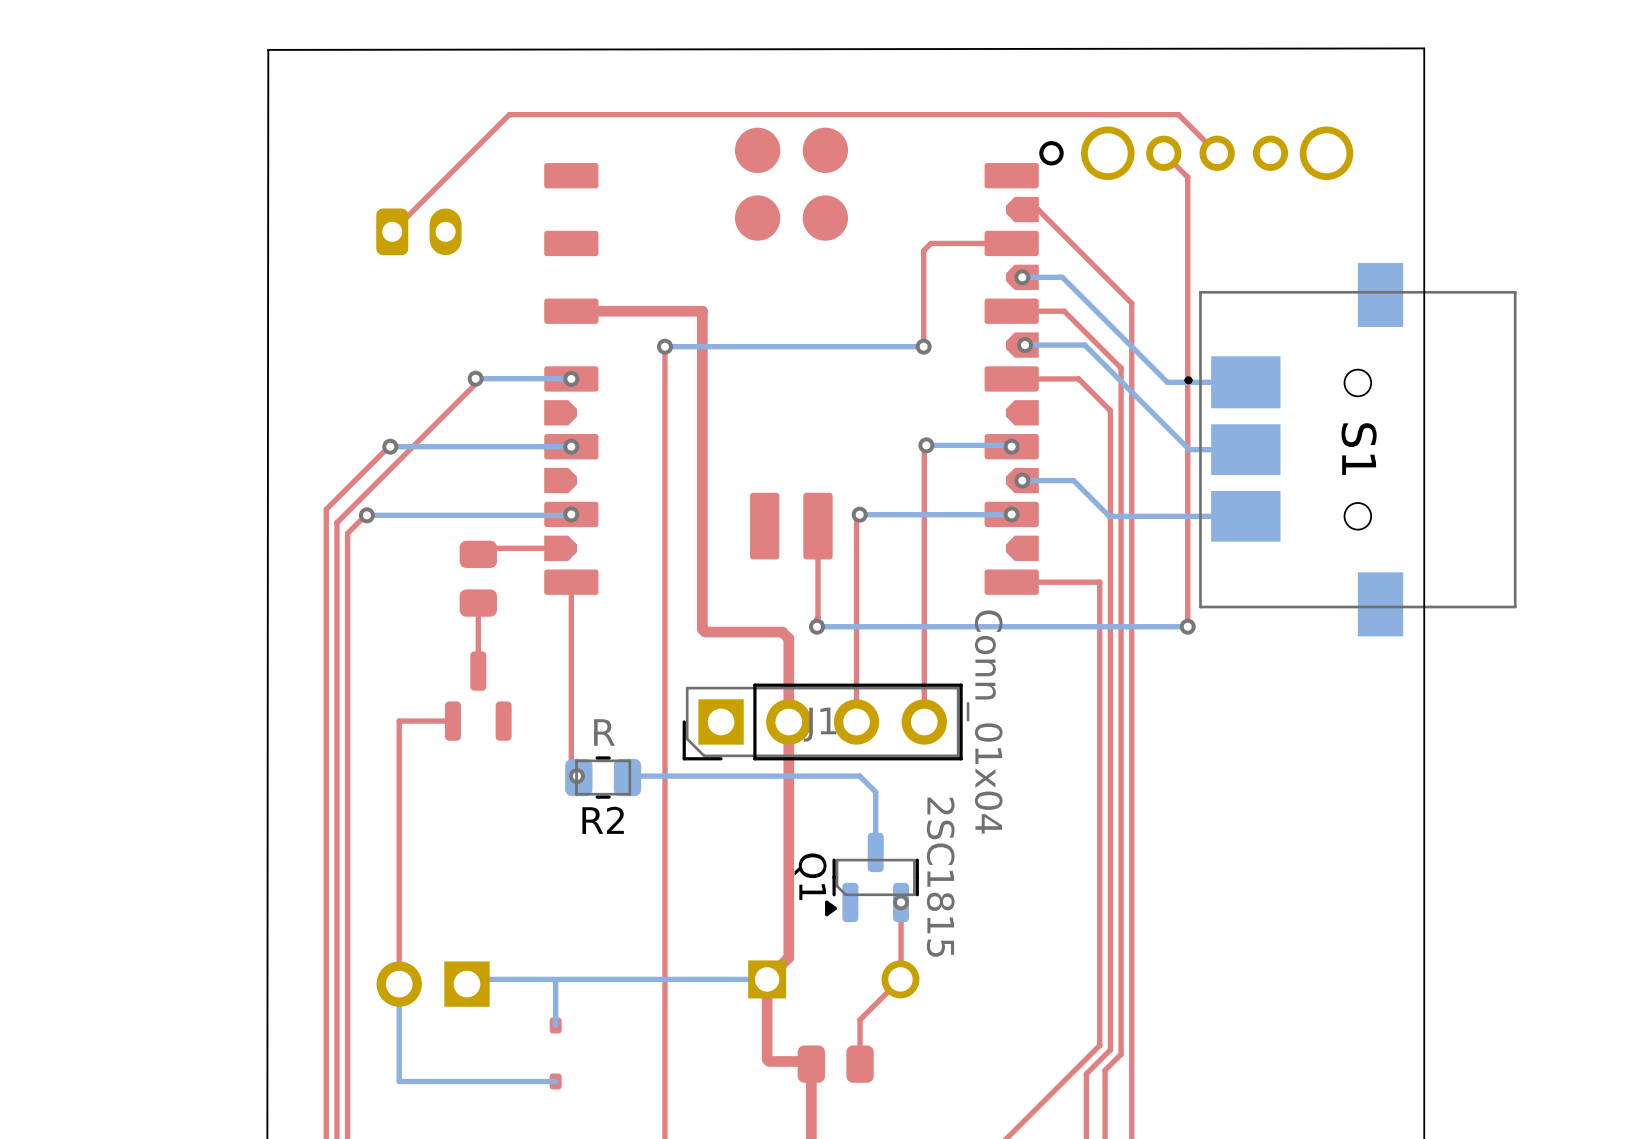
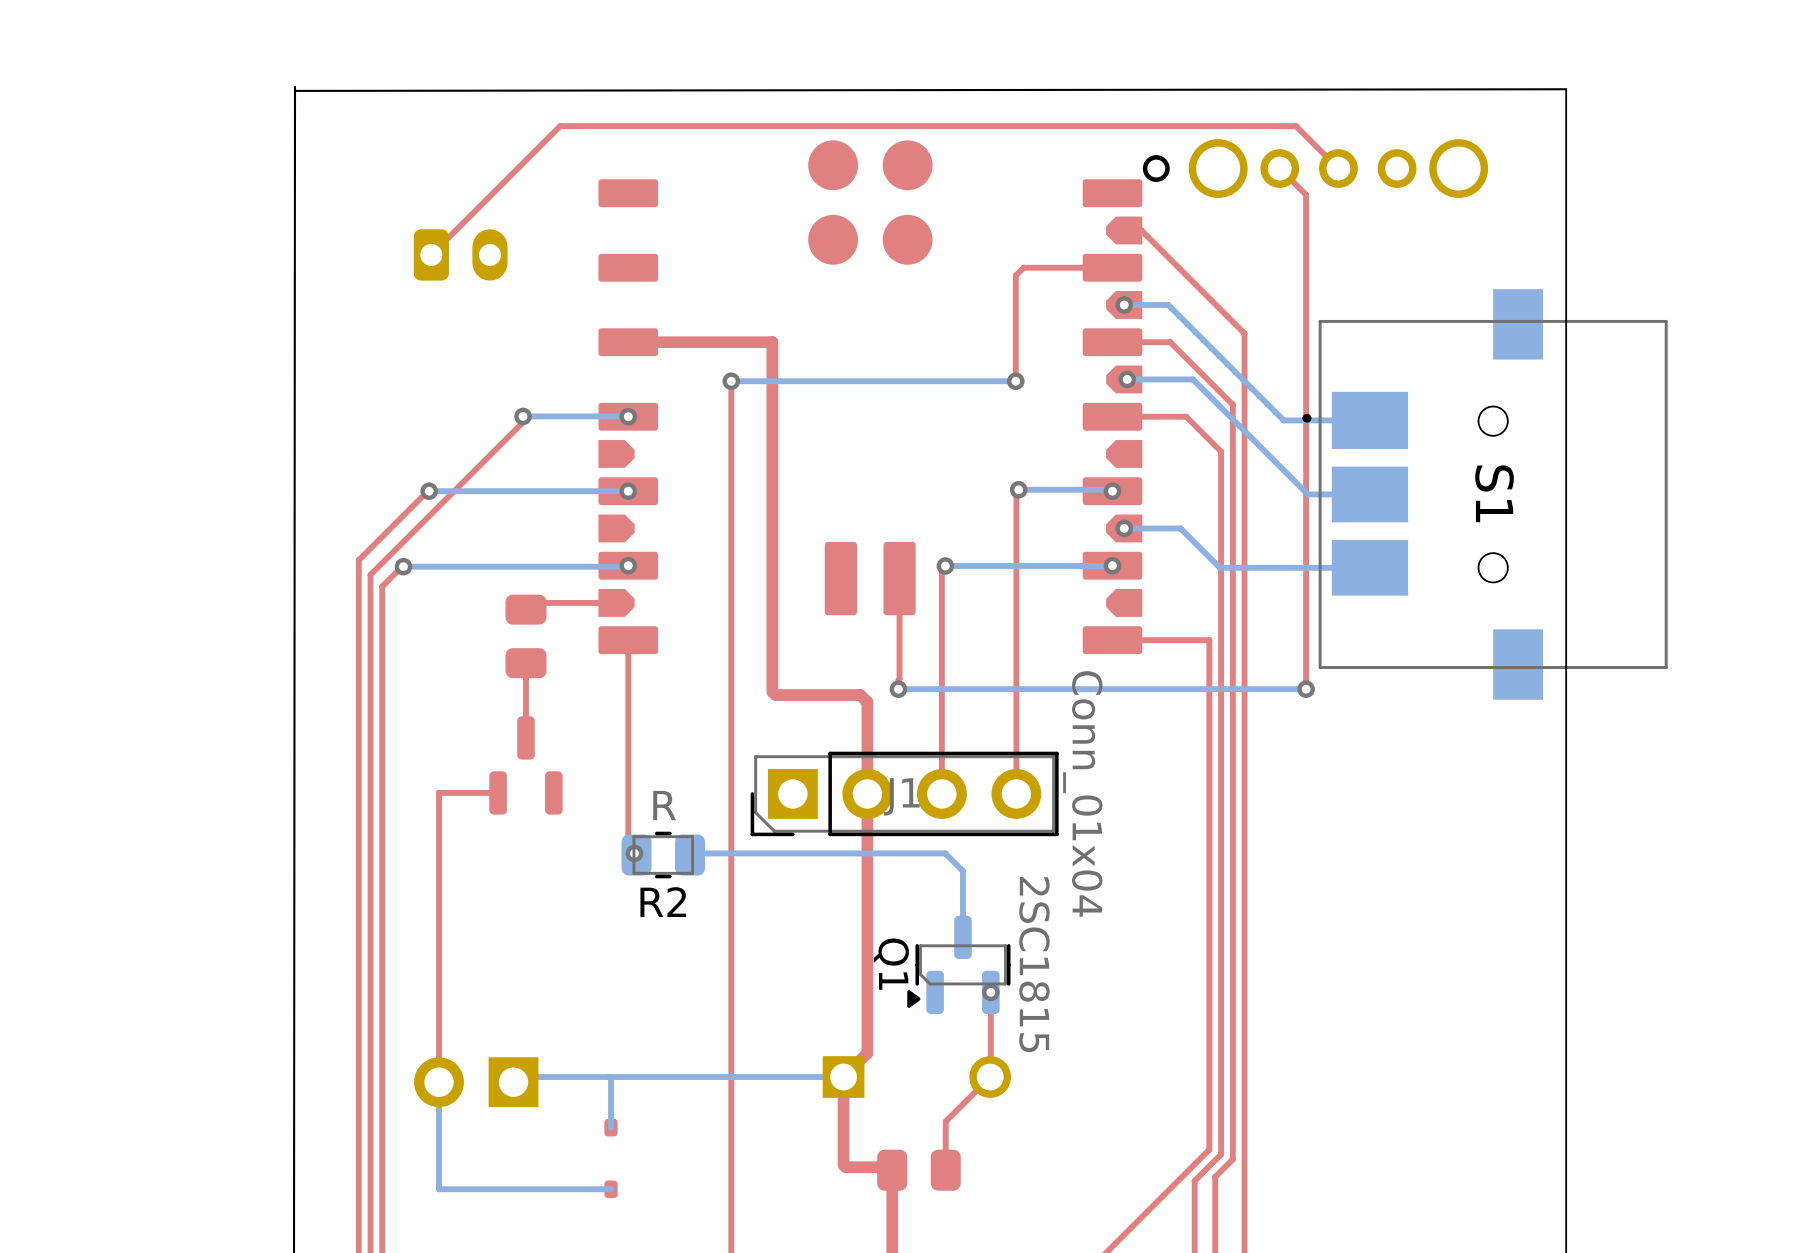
board edge: (268, 49) (1424, 48) (1424, 81) -> (295, 90) (1566, 89)
board edge: (268, 49) (268, 79) -> none

